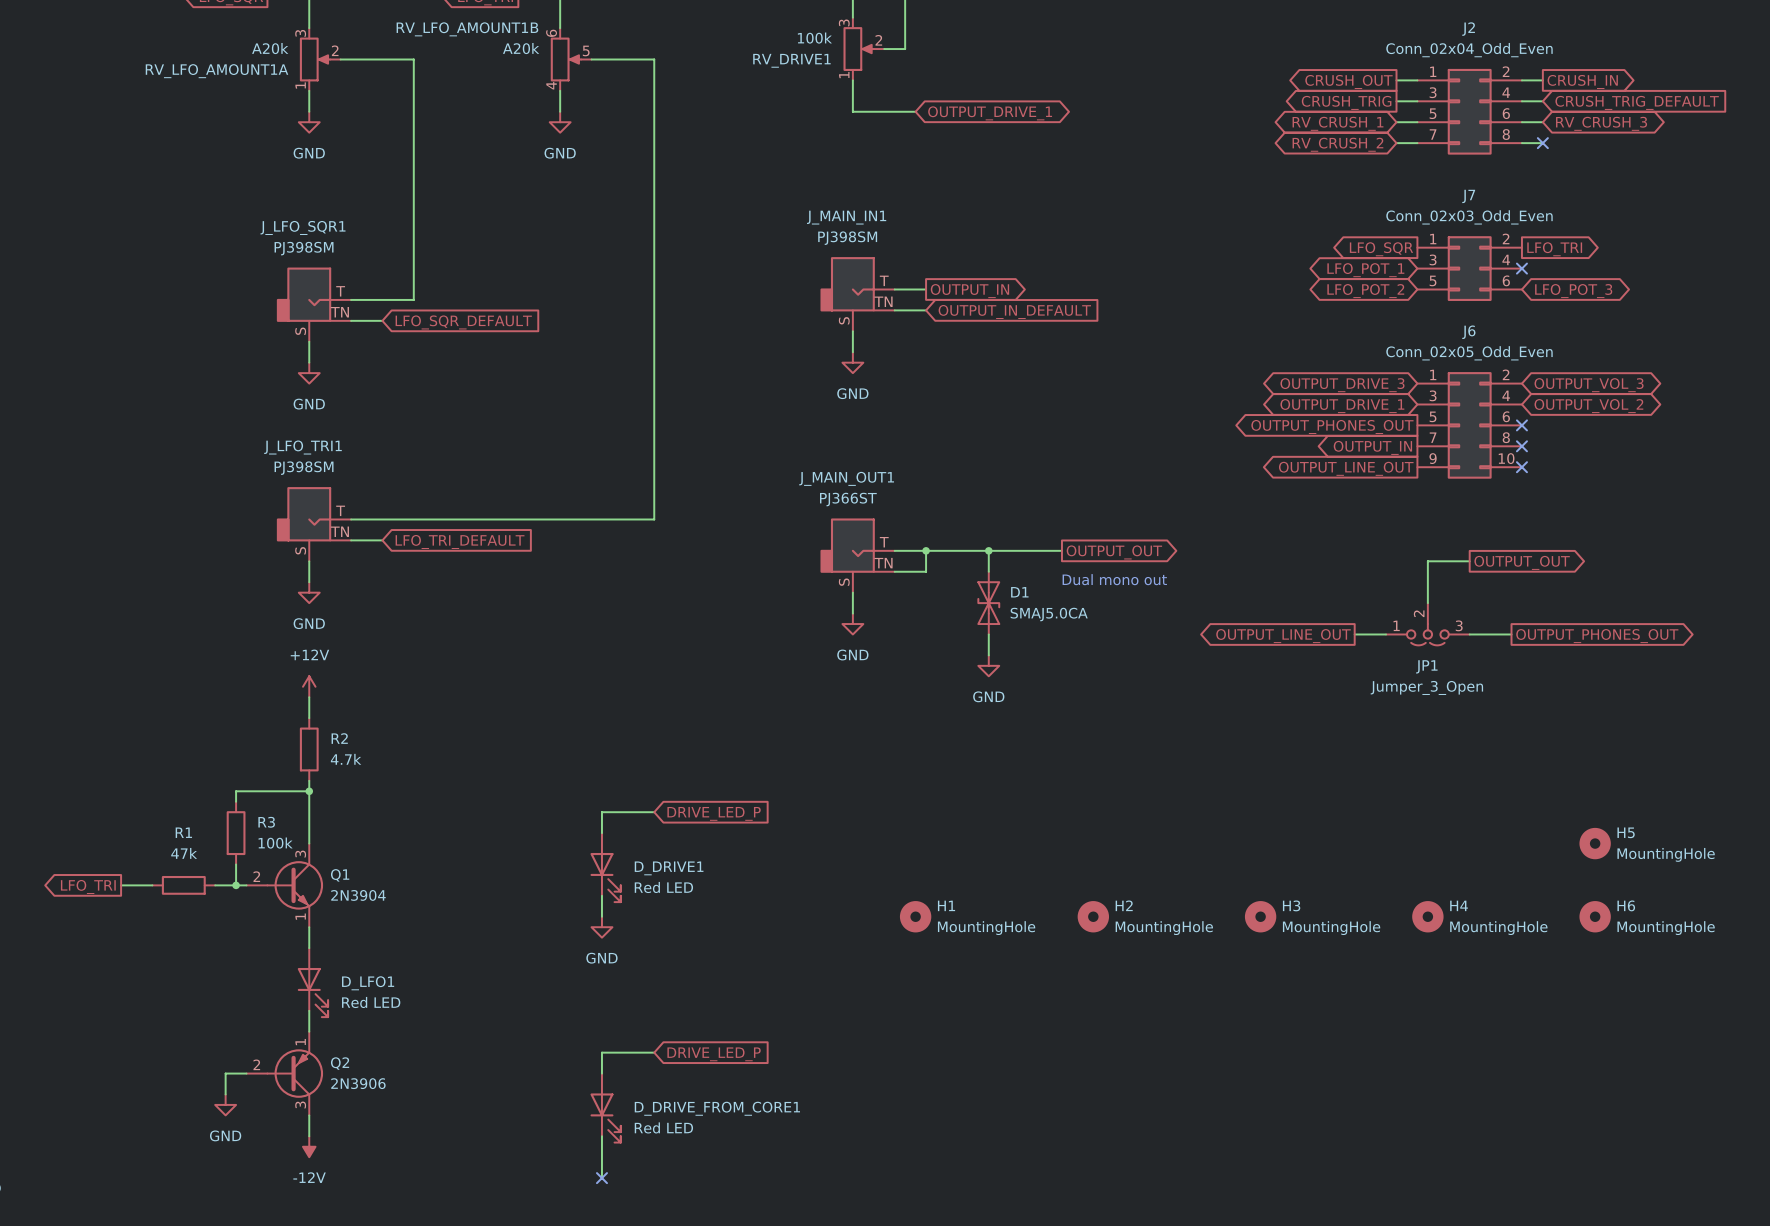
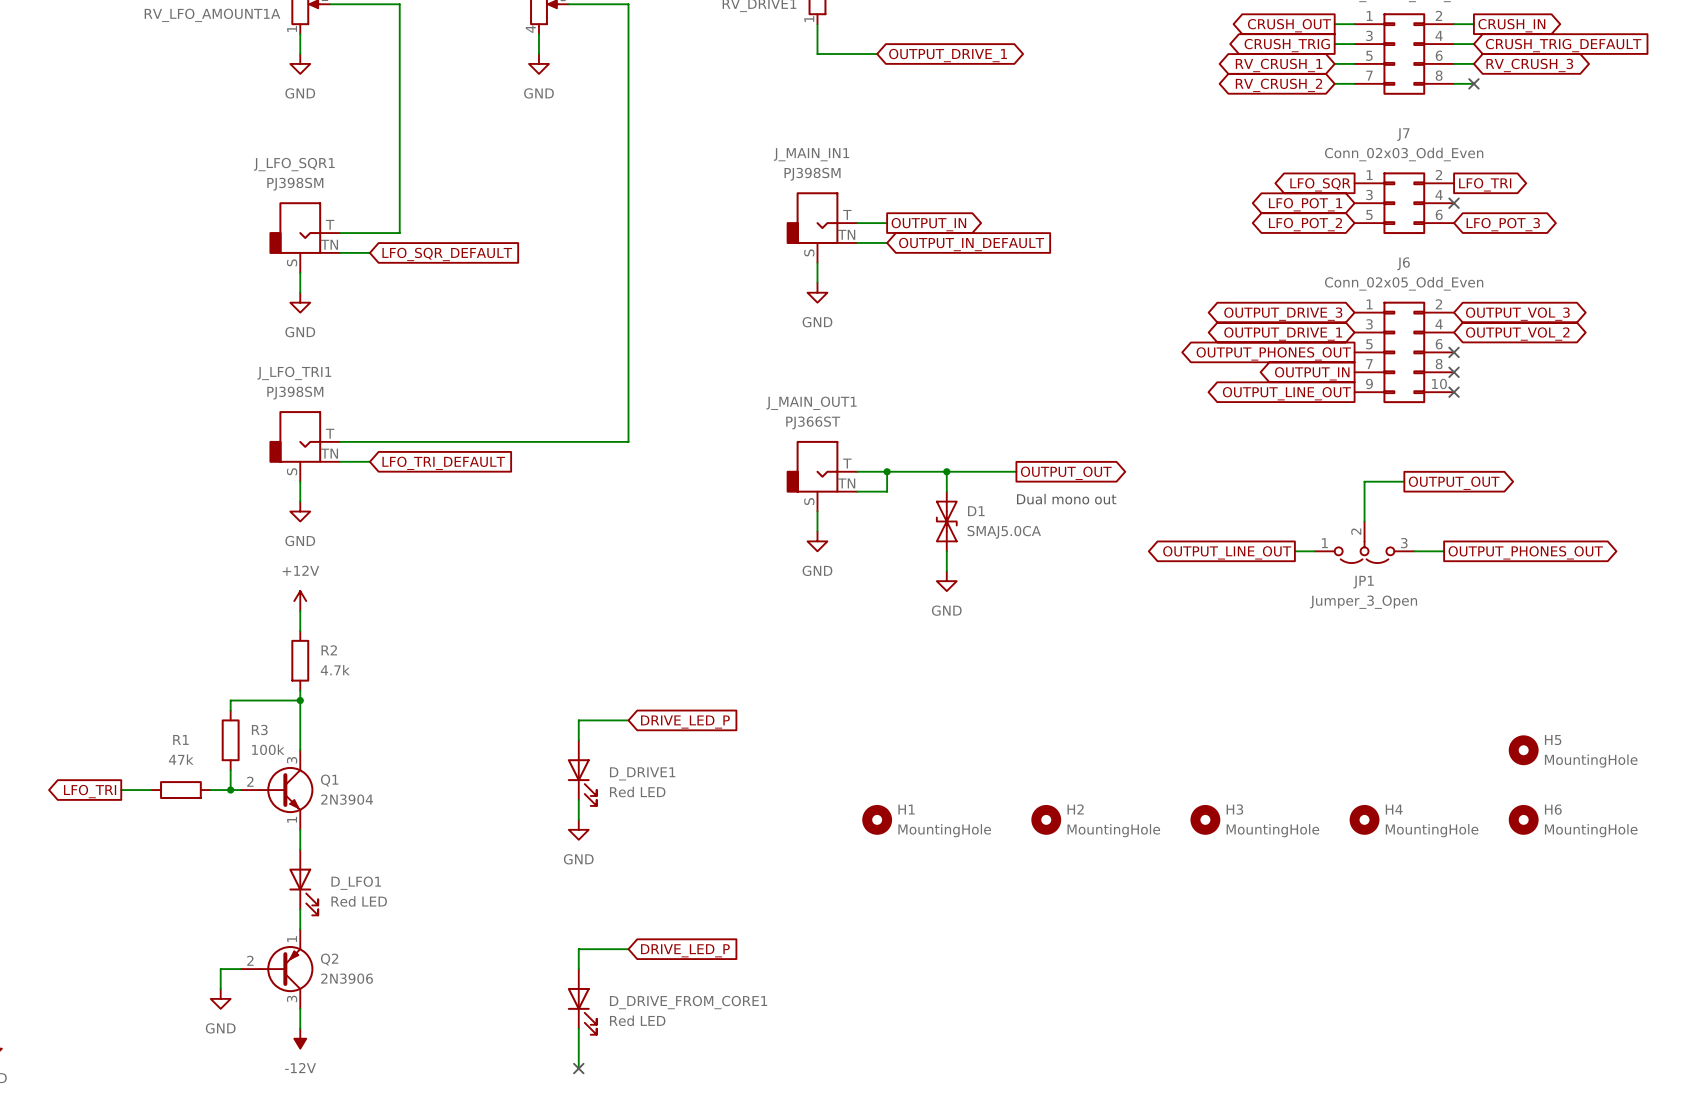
JP1 symbol: [1386, 603, 1470, 646] -> [1314, 521, 1415, 564]

